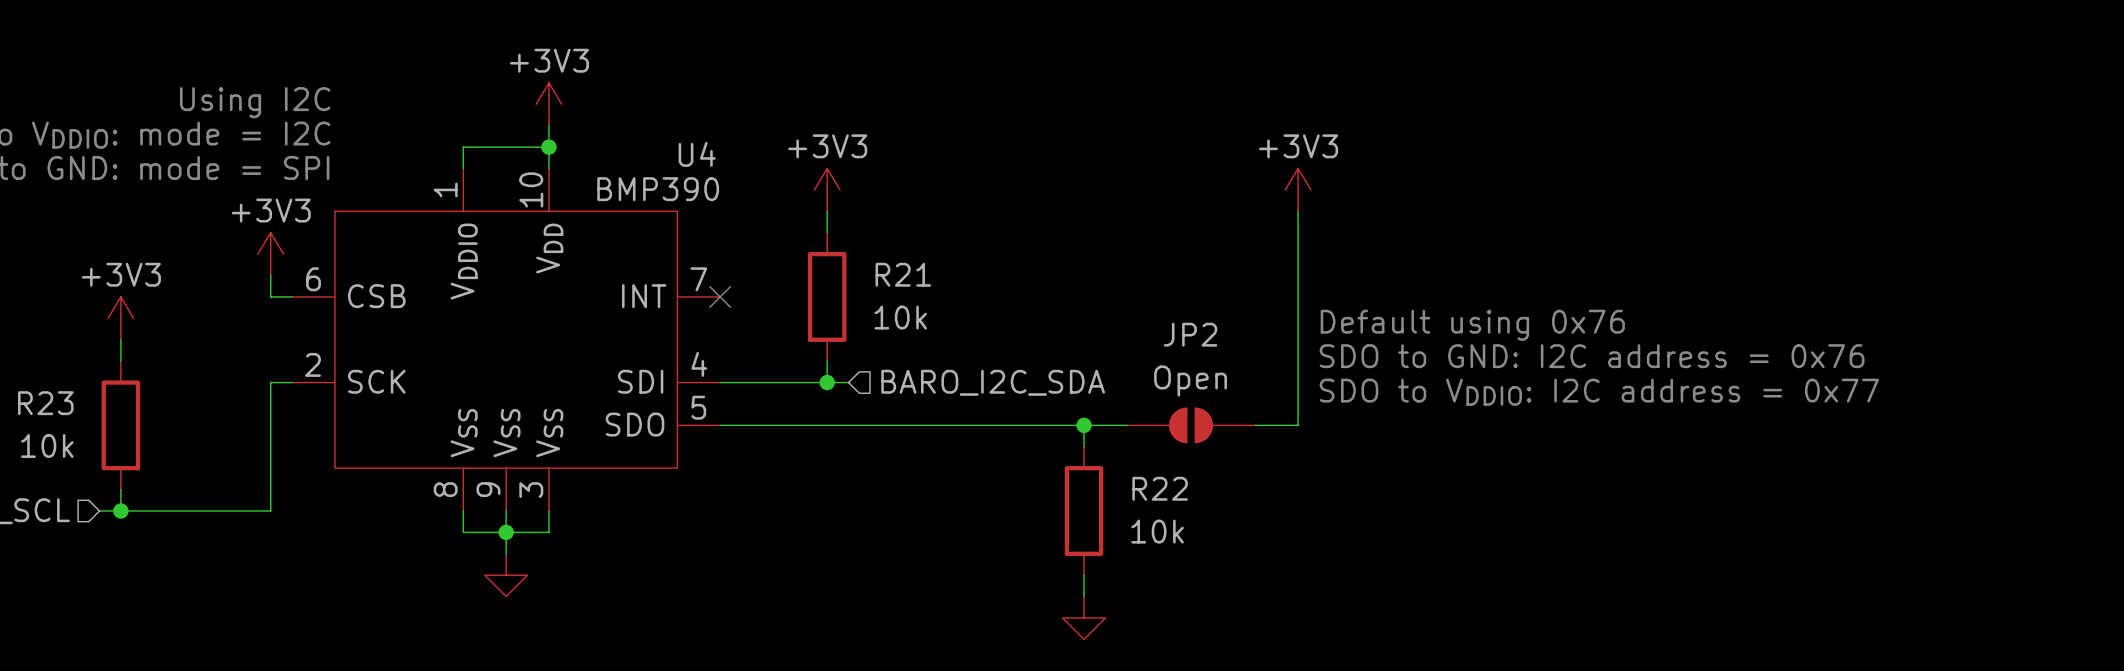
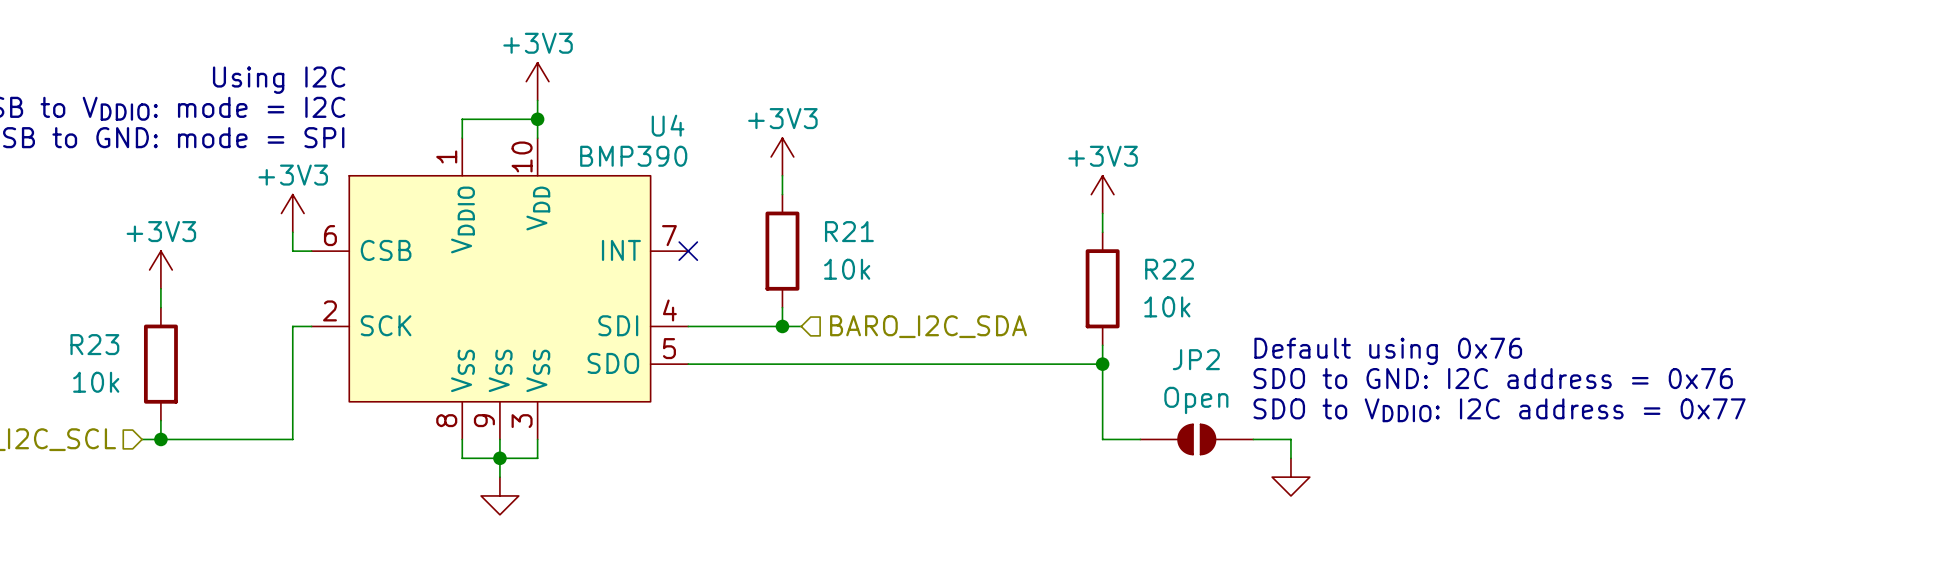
power symbol position: +3V3 (1298, 189) -> +3V3 (1102, 194)
wire: (1298, 211) (1298, 425) (1255, 425) -> none
text position: Default using 0x76 (1472, 325) -> Default using 0x76 (1388, 351)
text position: SDO to GND: I2C address = 0x76 (1592, 356) -> SDO to GND: I2C address = 0x76 (1493, 378)
text position: SDO to VDDIO: I2C address = 0x77 (1599, 392) -> SDO to VDDIO: I2C address = 0x77 (1499, 410)
wire: none -> (1102, 345) (1102, 439) (1140, 439)
wire: (1084, 425) (1084, 446) -> (1102, 213) (1102, 232)
junction: (1084, 425) -> none
junction: none -> (1102, 364)
JP2 position: (1191, 425) -> (1196, 439)
R22 position: (1084, 510) -> (1102, 288)
wire: none -> (1253, 439) (1290, 439) (1290, 458)
wire: (1084, 575) (1084, 596) -> none
power symbol position: (1084, 618) -> (1290, 477)

